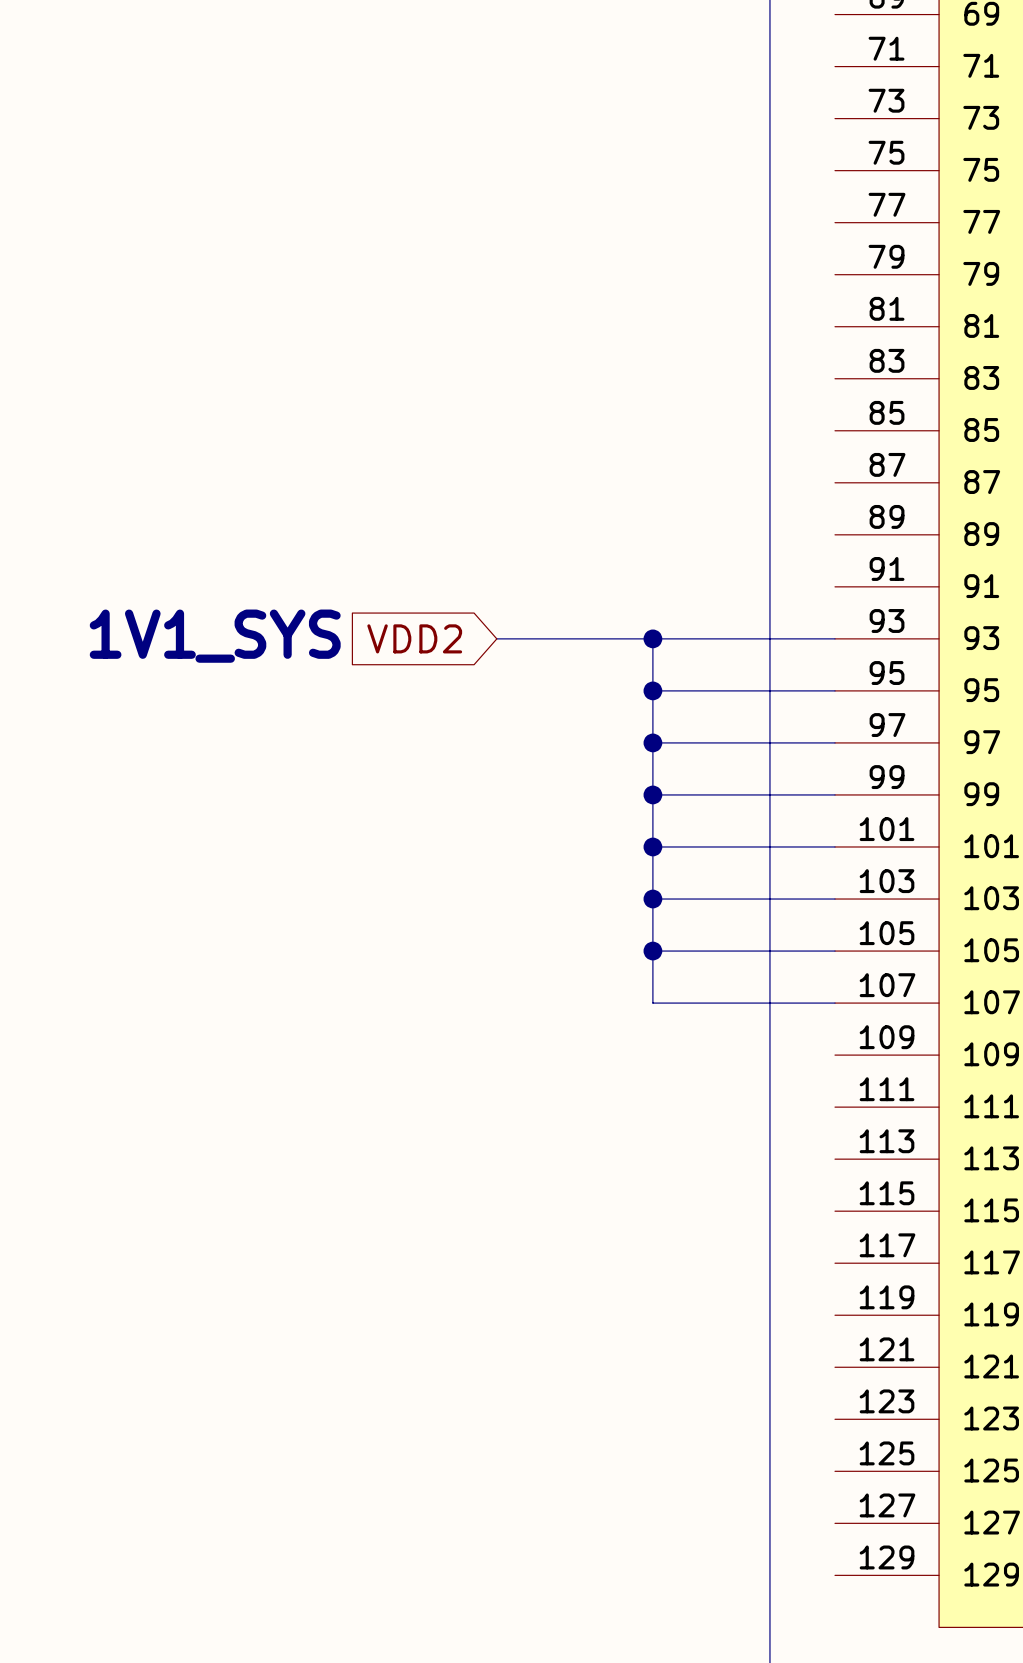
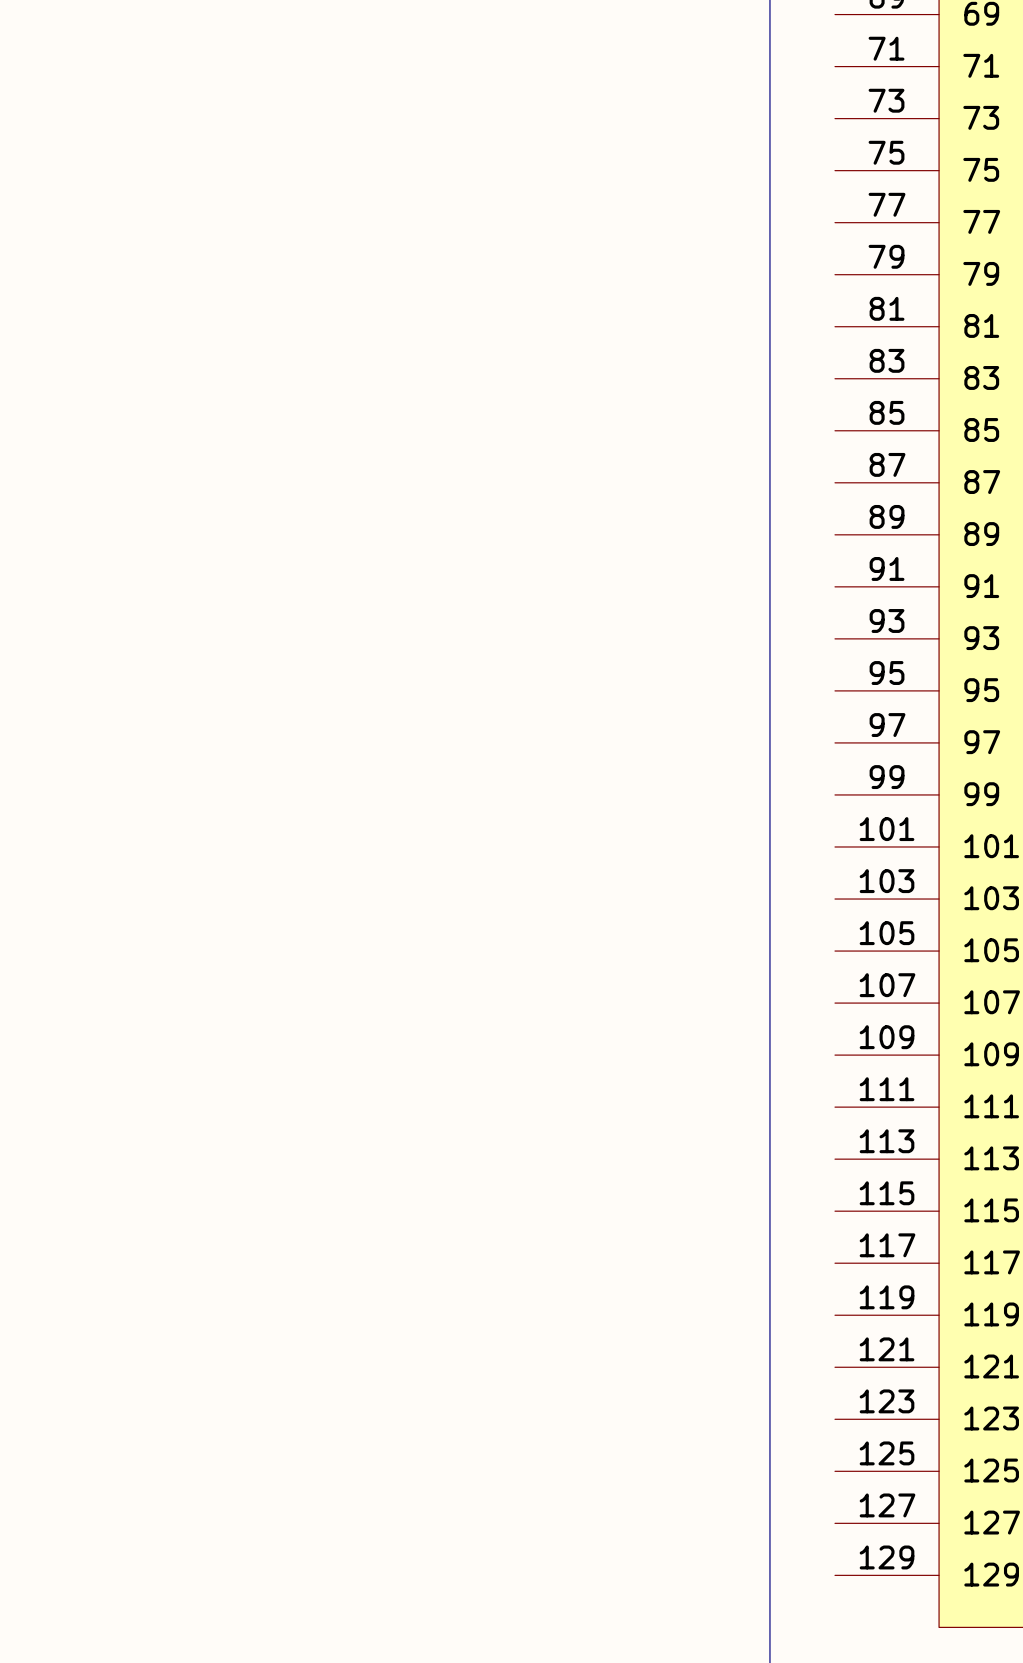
text: 1V1_SYS (215, 636) -> none
global label: VDD2 (414, 638) -> none
wire: (496, 638) (835, 638) -> none
wire: (652, 638) (652, 1003) (835, 1003) -> none
junction: (652, 638) -> none
wire: (652, 690) (835, 690) -> none
junction: (652, 690) -> none
wire: (652, 742) (835, 742) -> none
junction: (652, 742) -> none
wire: (652, 794) (835, 794) -> none
junction: (652, 794) -> none
wire: (652, 846) (835, 846) -> none
junction: (652, 846) -> none
wire: (652, 899) (835, 899) -> none
junction: (652, 899) -> none
wire: (652, 951) (835, 951) -> none
junction: (652, 951) -> none

